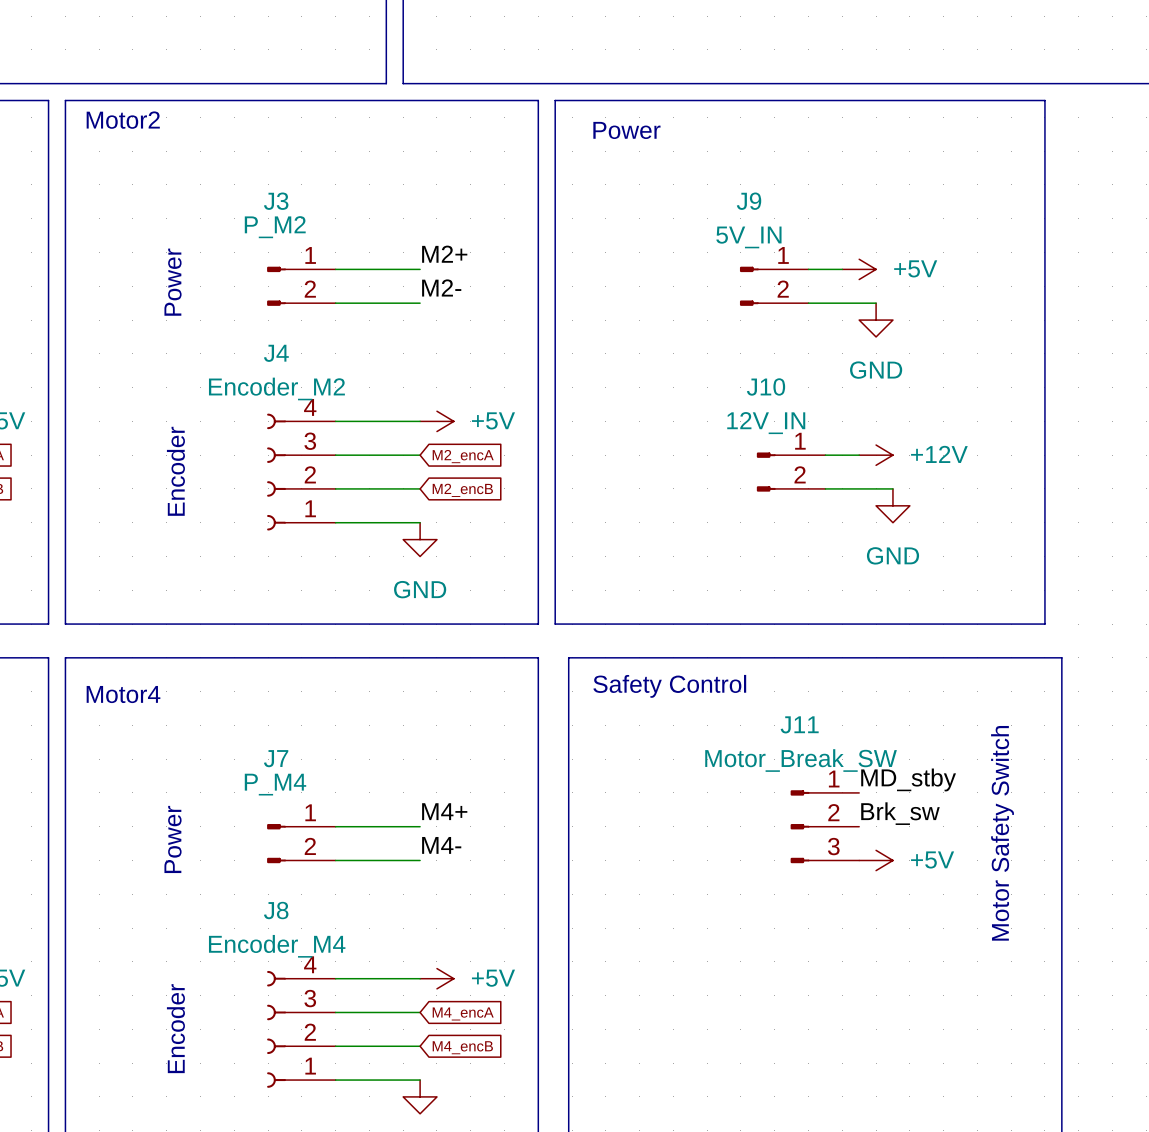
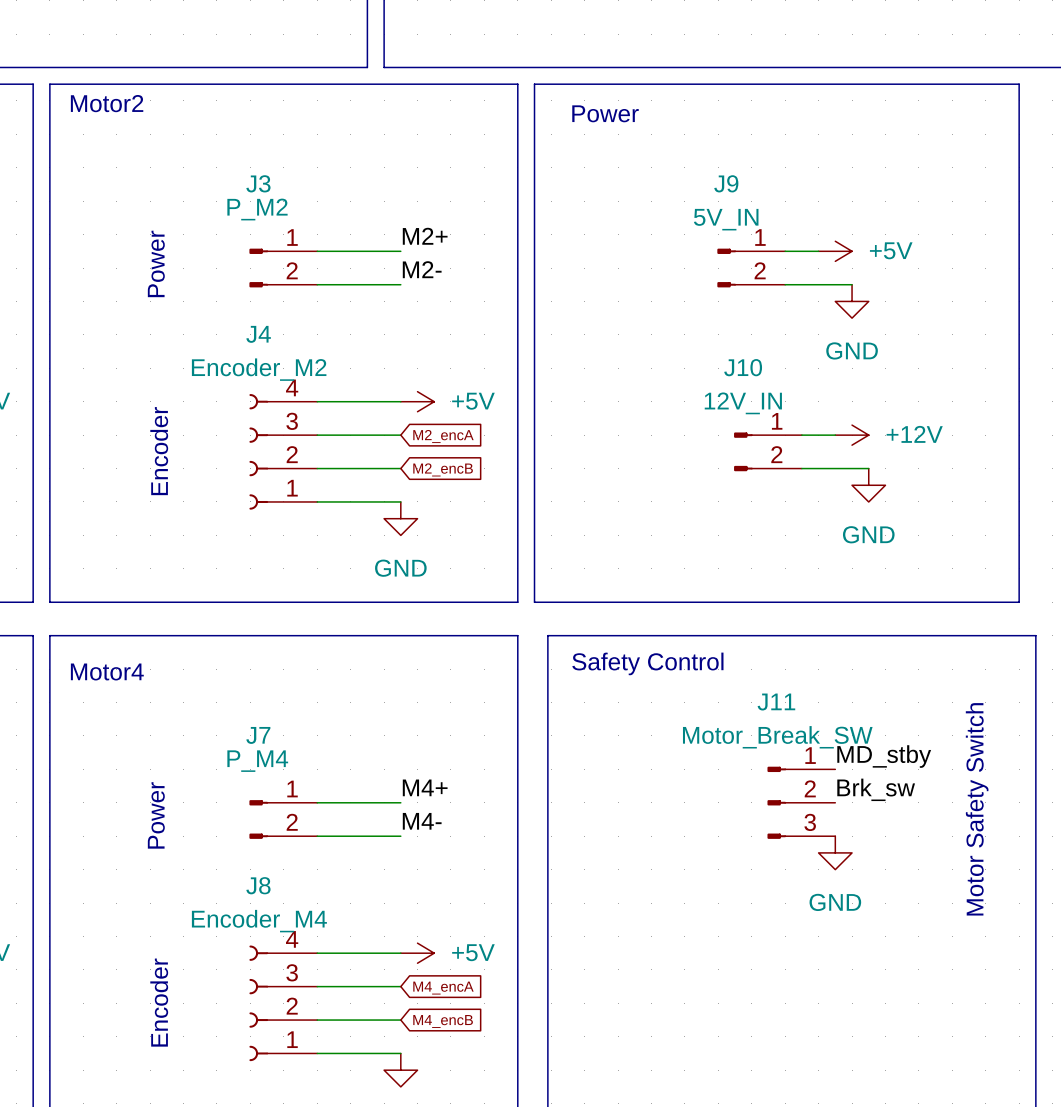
power symbol: +5V (876, 860) -> none
power symbol: none -> GND (835, 852)

